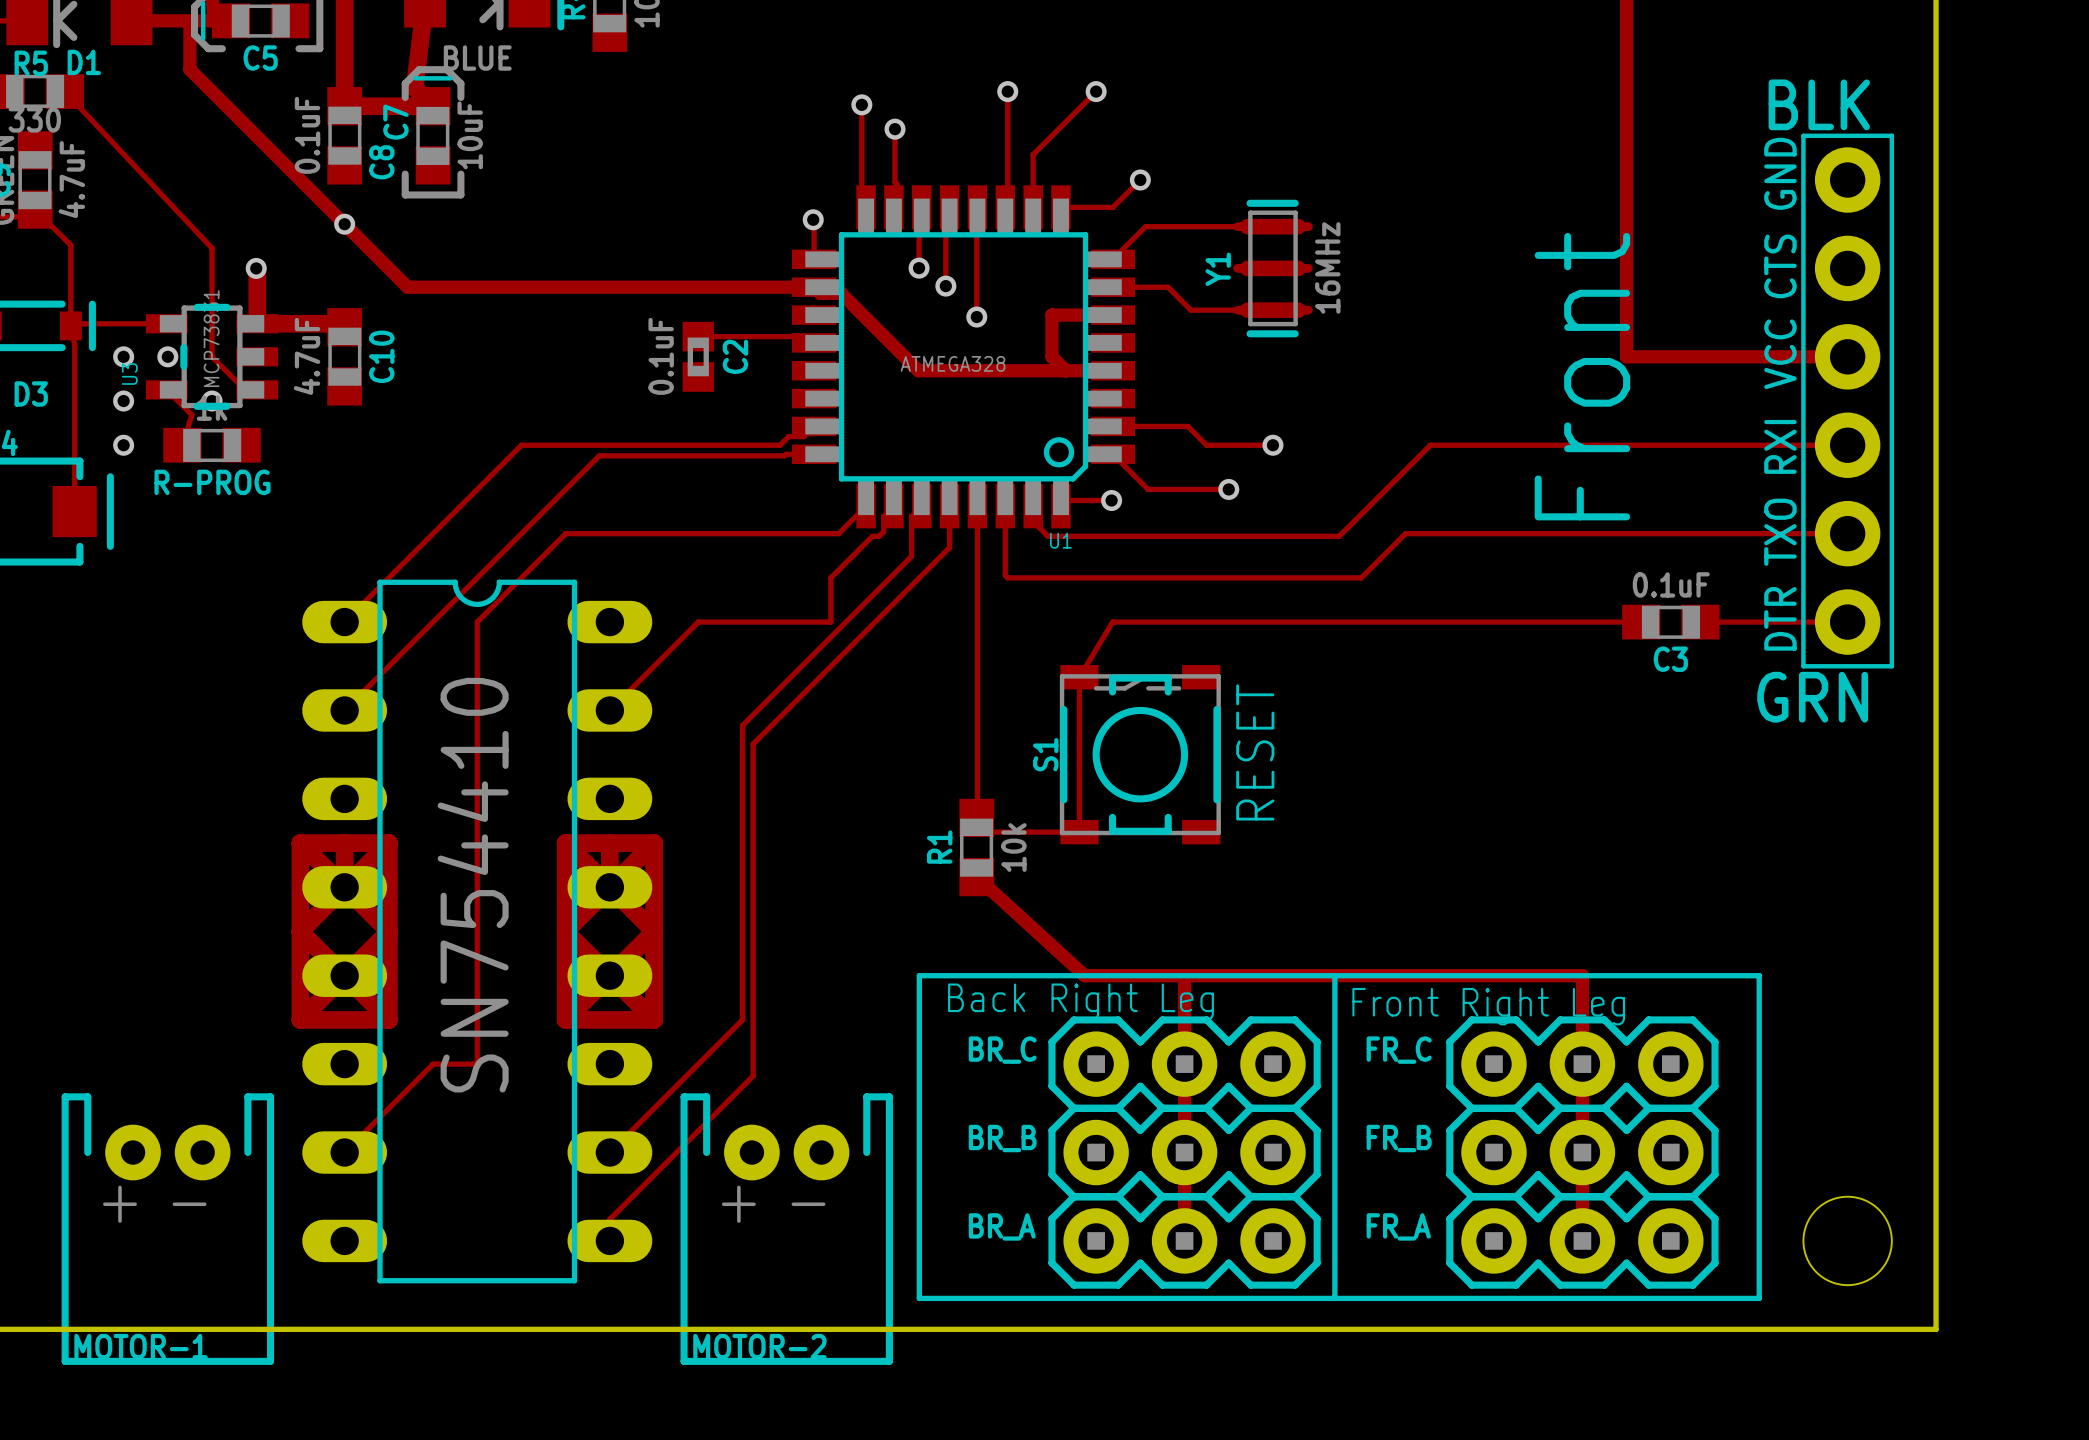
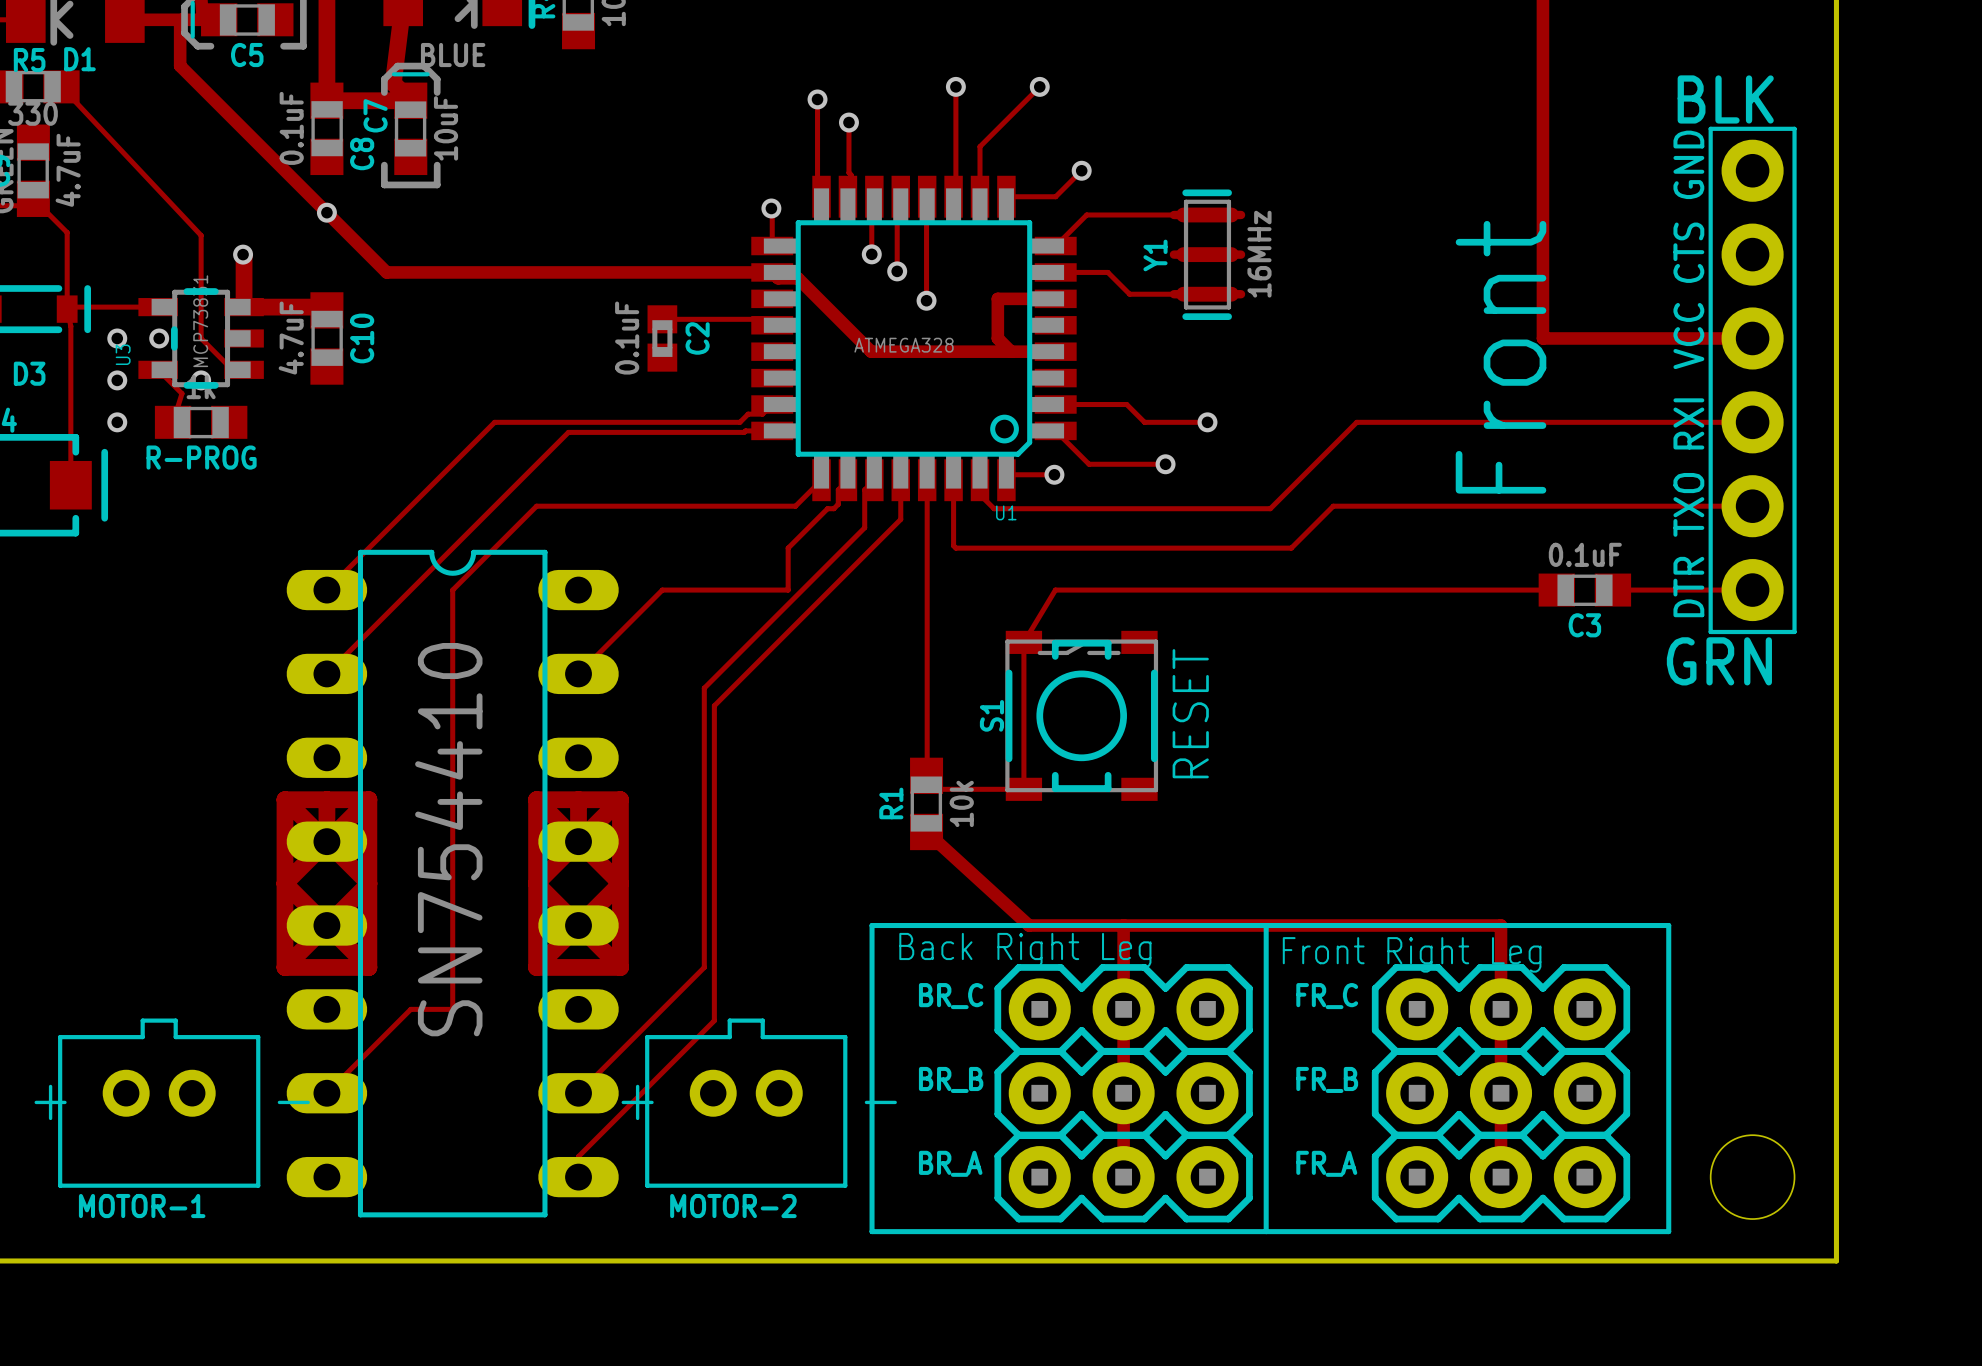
MOTOR-1 footprint: [61, 1093, 275, 1365] -> [58, 1018, 261, 1188]
MOTOR-2 footprint: [680, 1093, 893, 1365] -> [645, 1018, 848, 1188]

